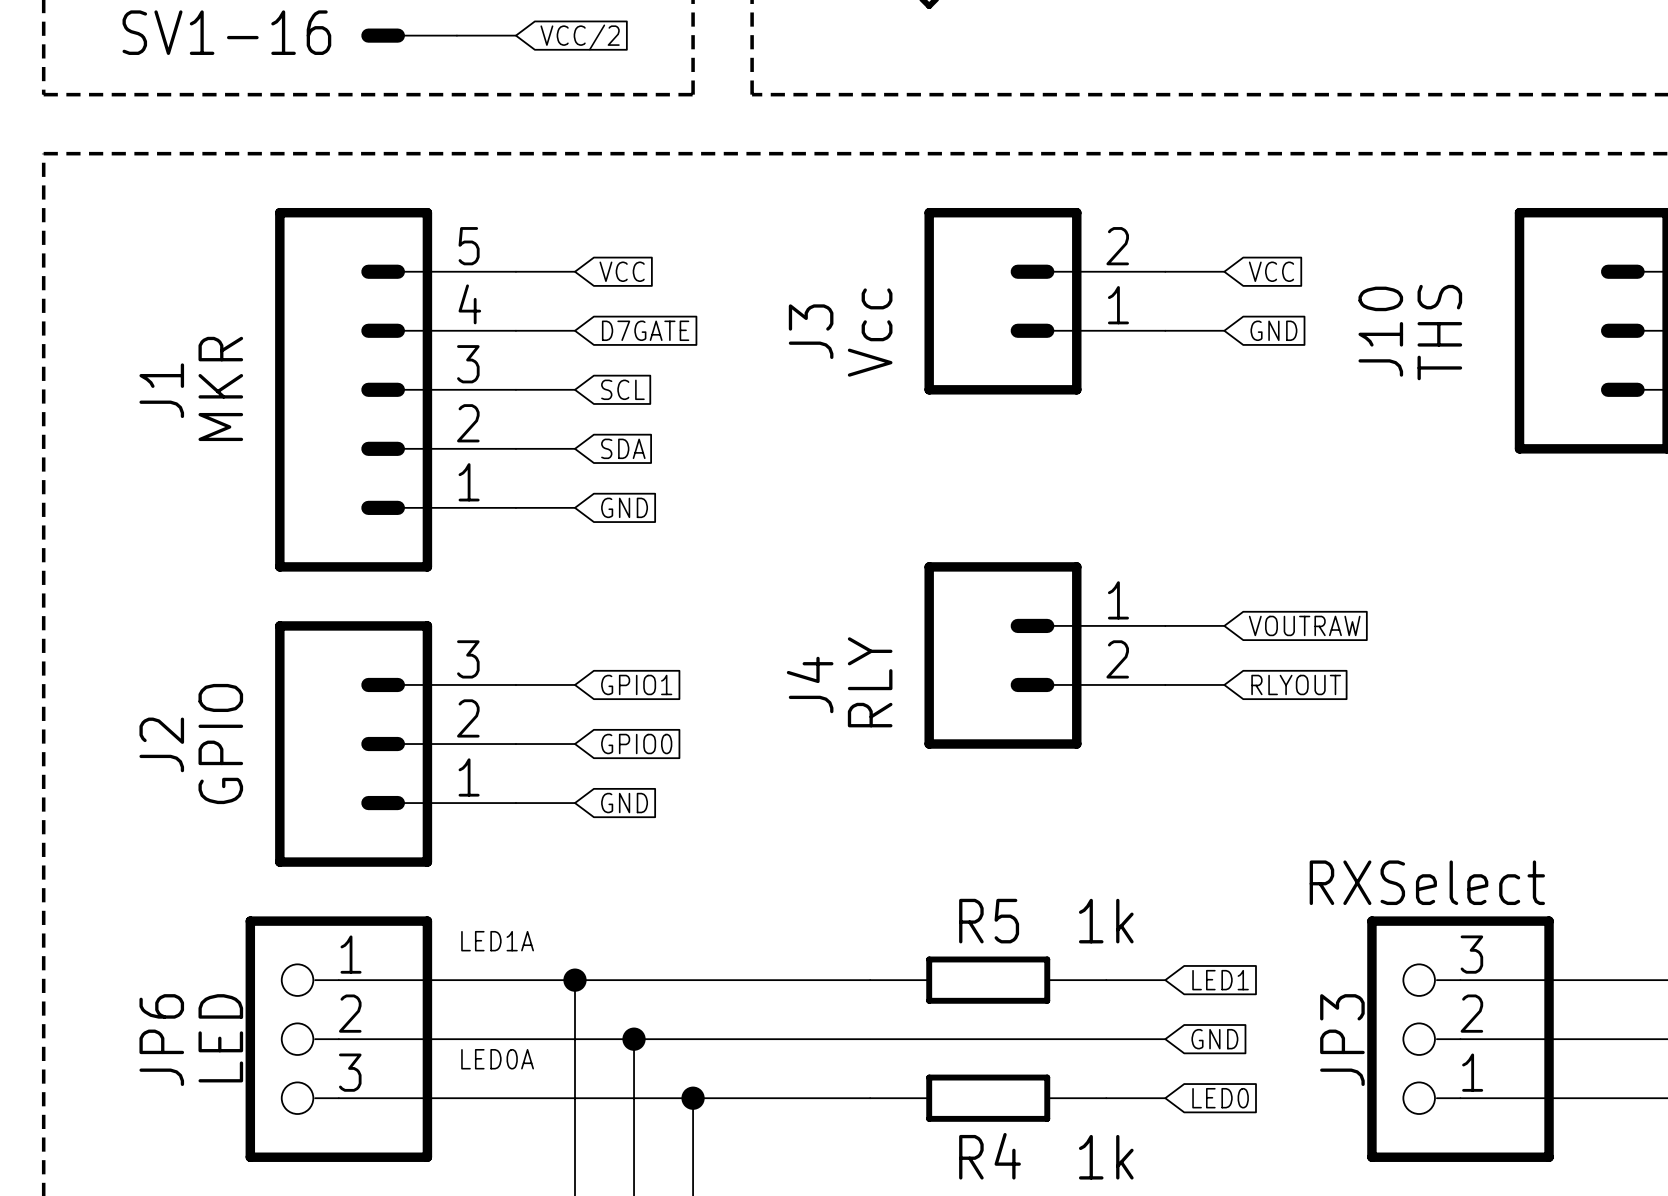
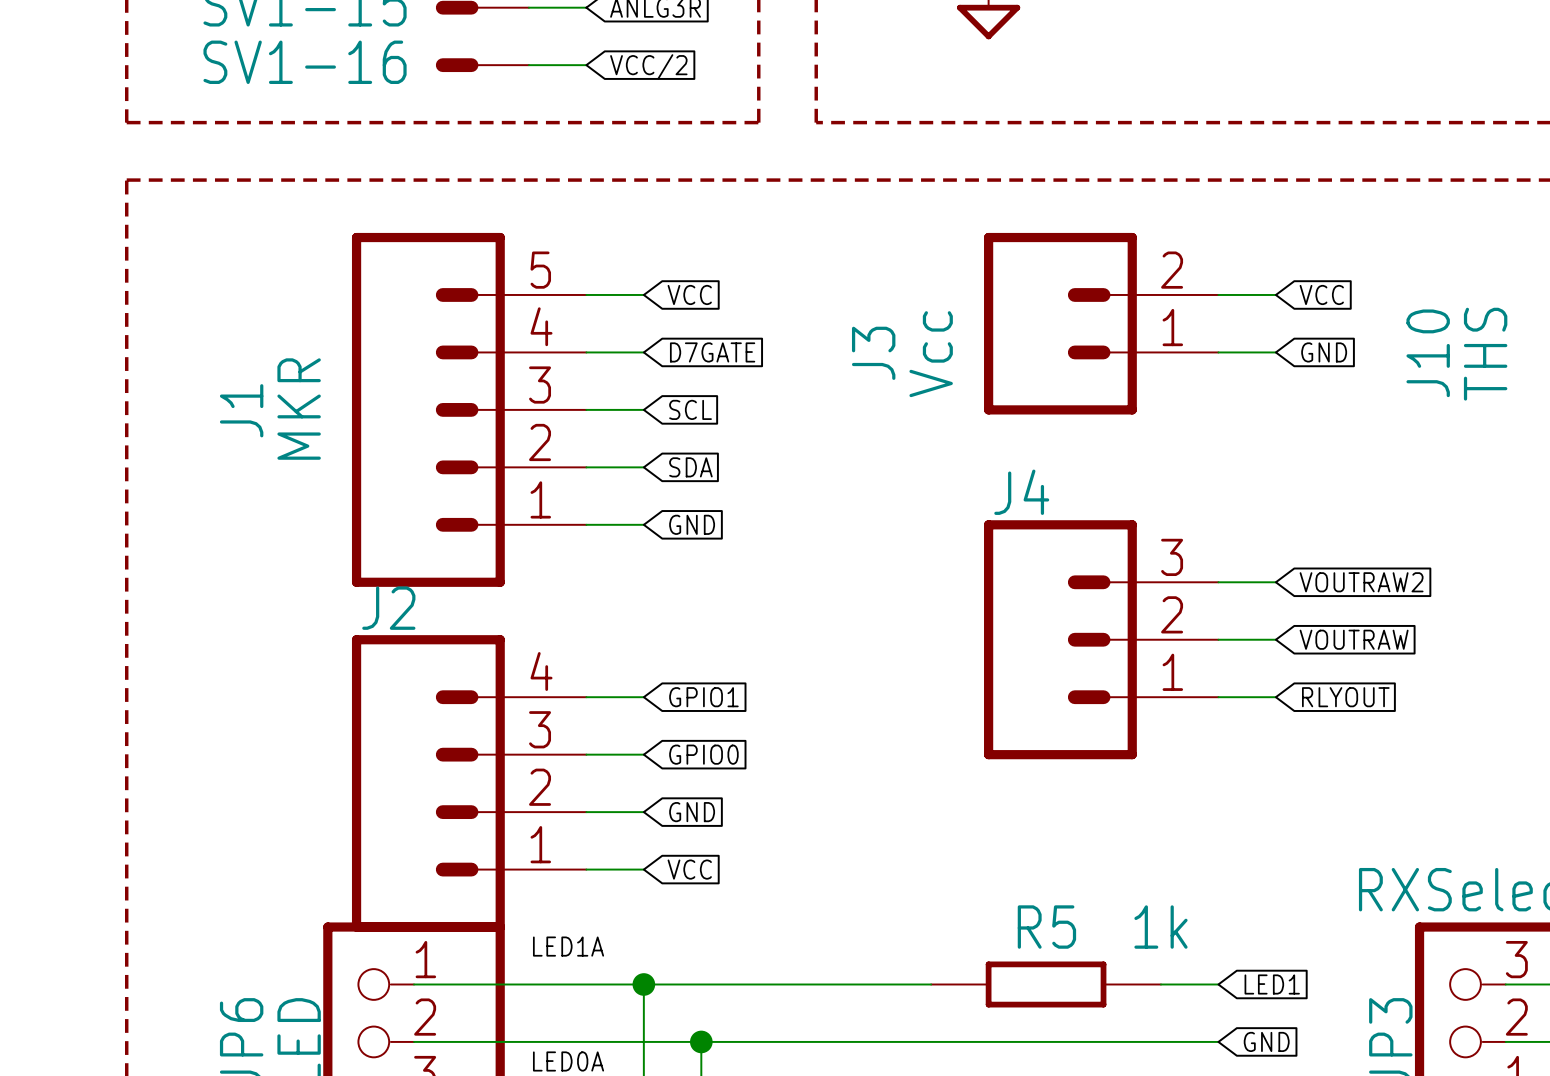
J4 symbol: [924, 562, 1166, 749] -> [984, 520, 1219, 760]
wire: none -> (1218, 582) (1275, 582)
global label: none -> VOUTRAW2 (1361, 582)
J2 symbol: [275, 621, 516, 867] -> [351, 635, 587, 932]
J4 value: RLY (870, 682) -> none
J4 name position: J4 (810, 684) -> J4 (1021, 492)
J2 name position: J2 (161, 744) -> J2 (388, 608)
J2 value: GPIO (220, 744) -> none
wire: none -> (586, 869) (643, 869)
global label: none -> VCC (689, 869)

